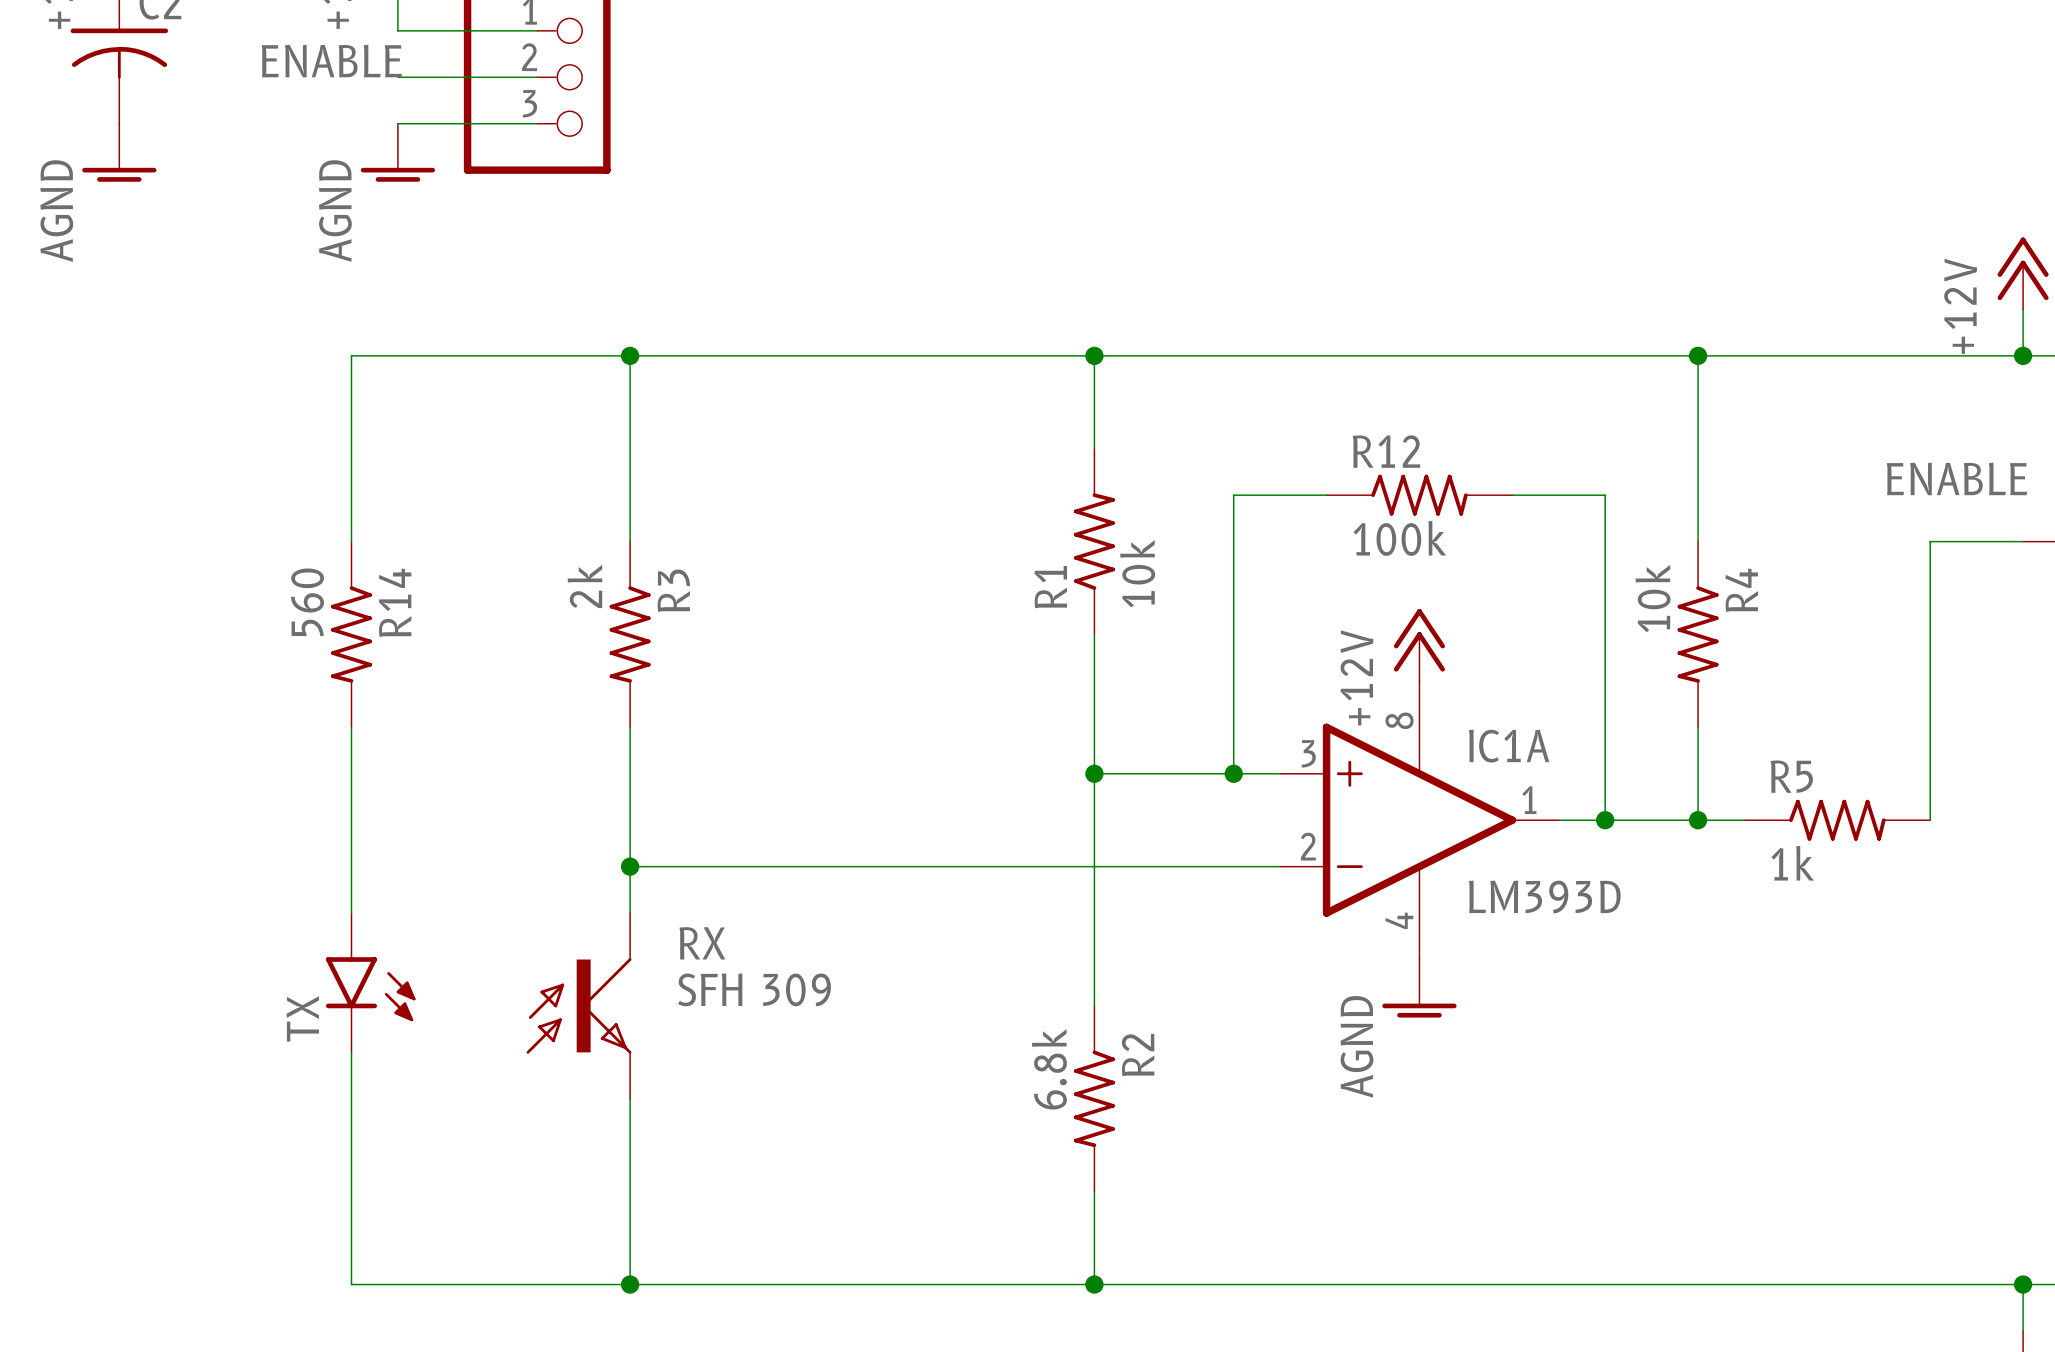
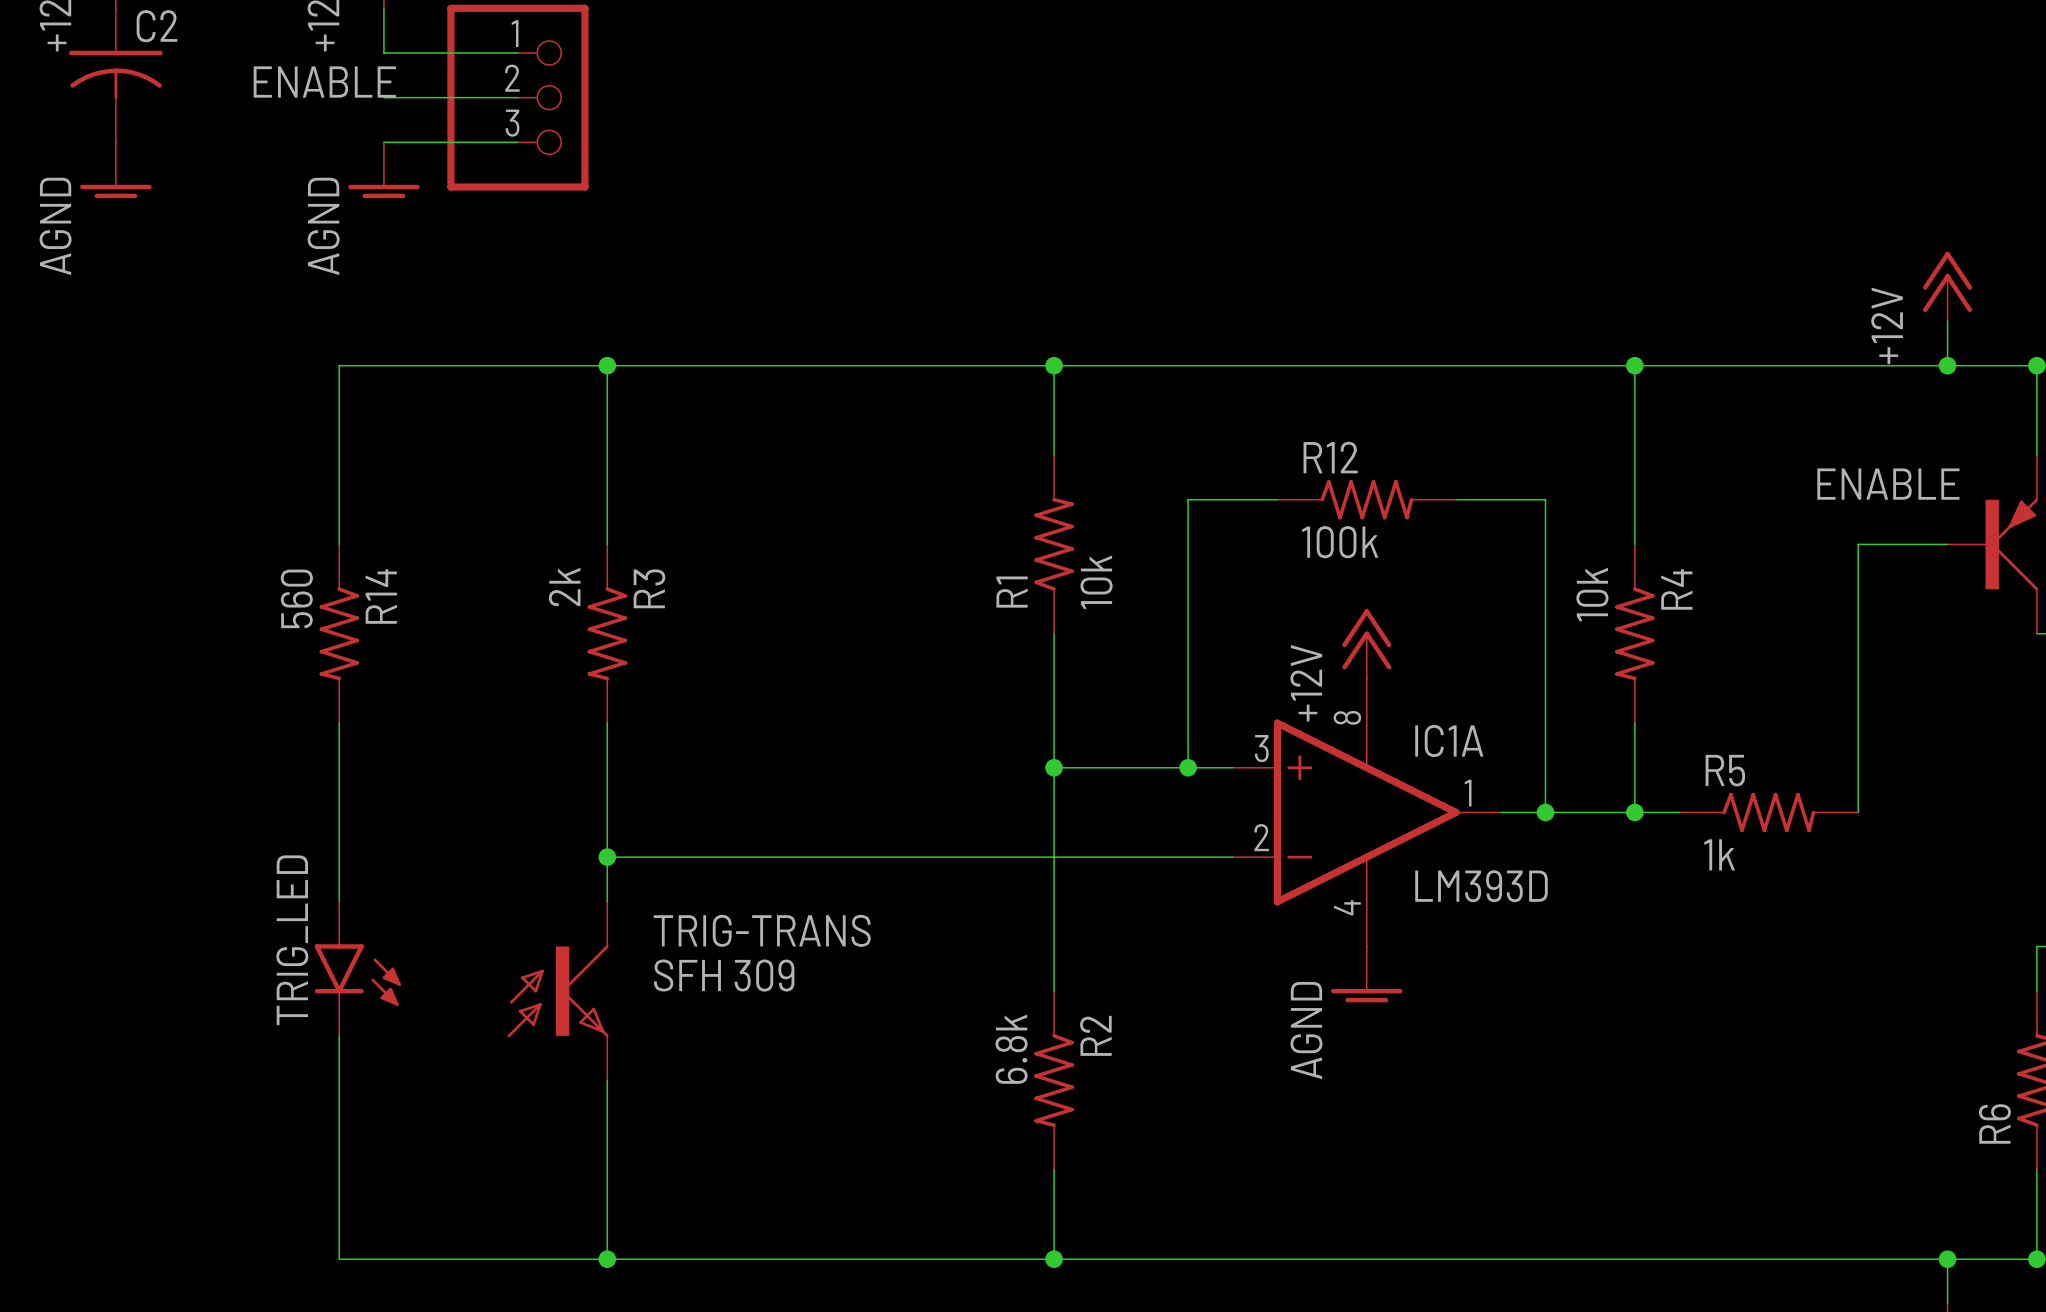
RX name: RX (702, 943) -> TRIG-TRANS (762, 930)
TX name: TX (302, 1018) -> TRIG_LED (292, 940)

